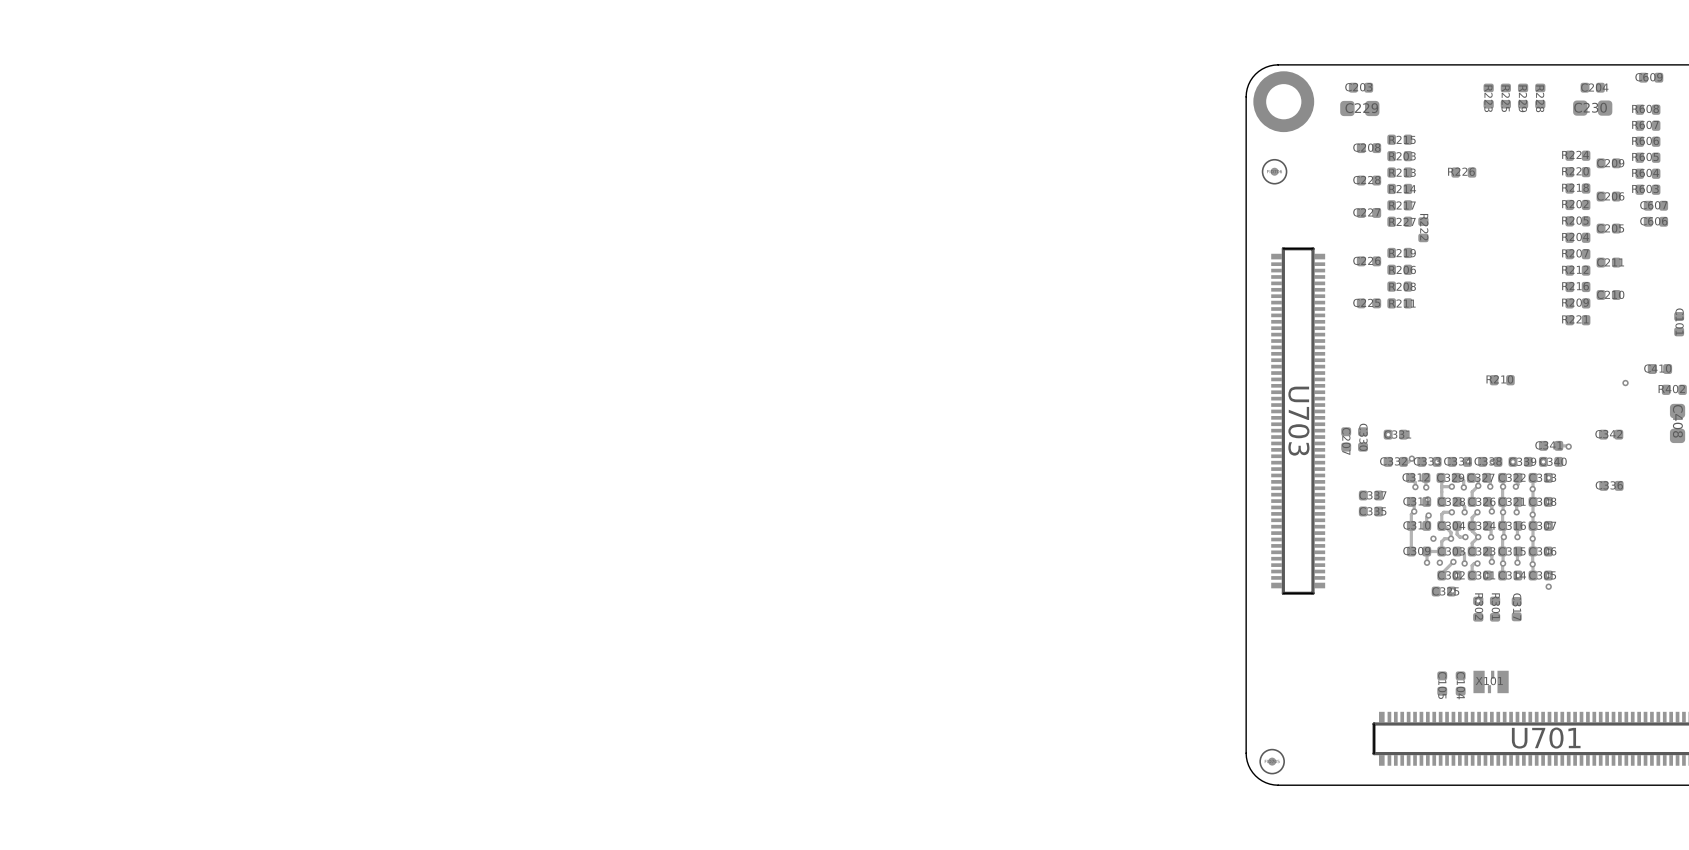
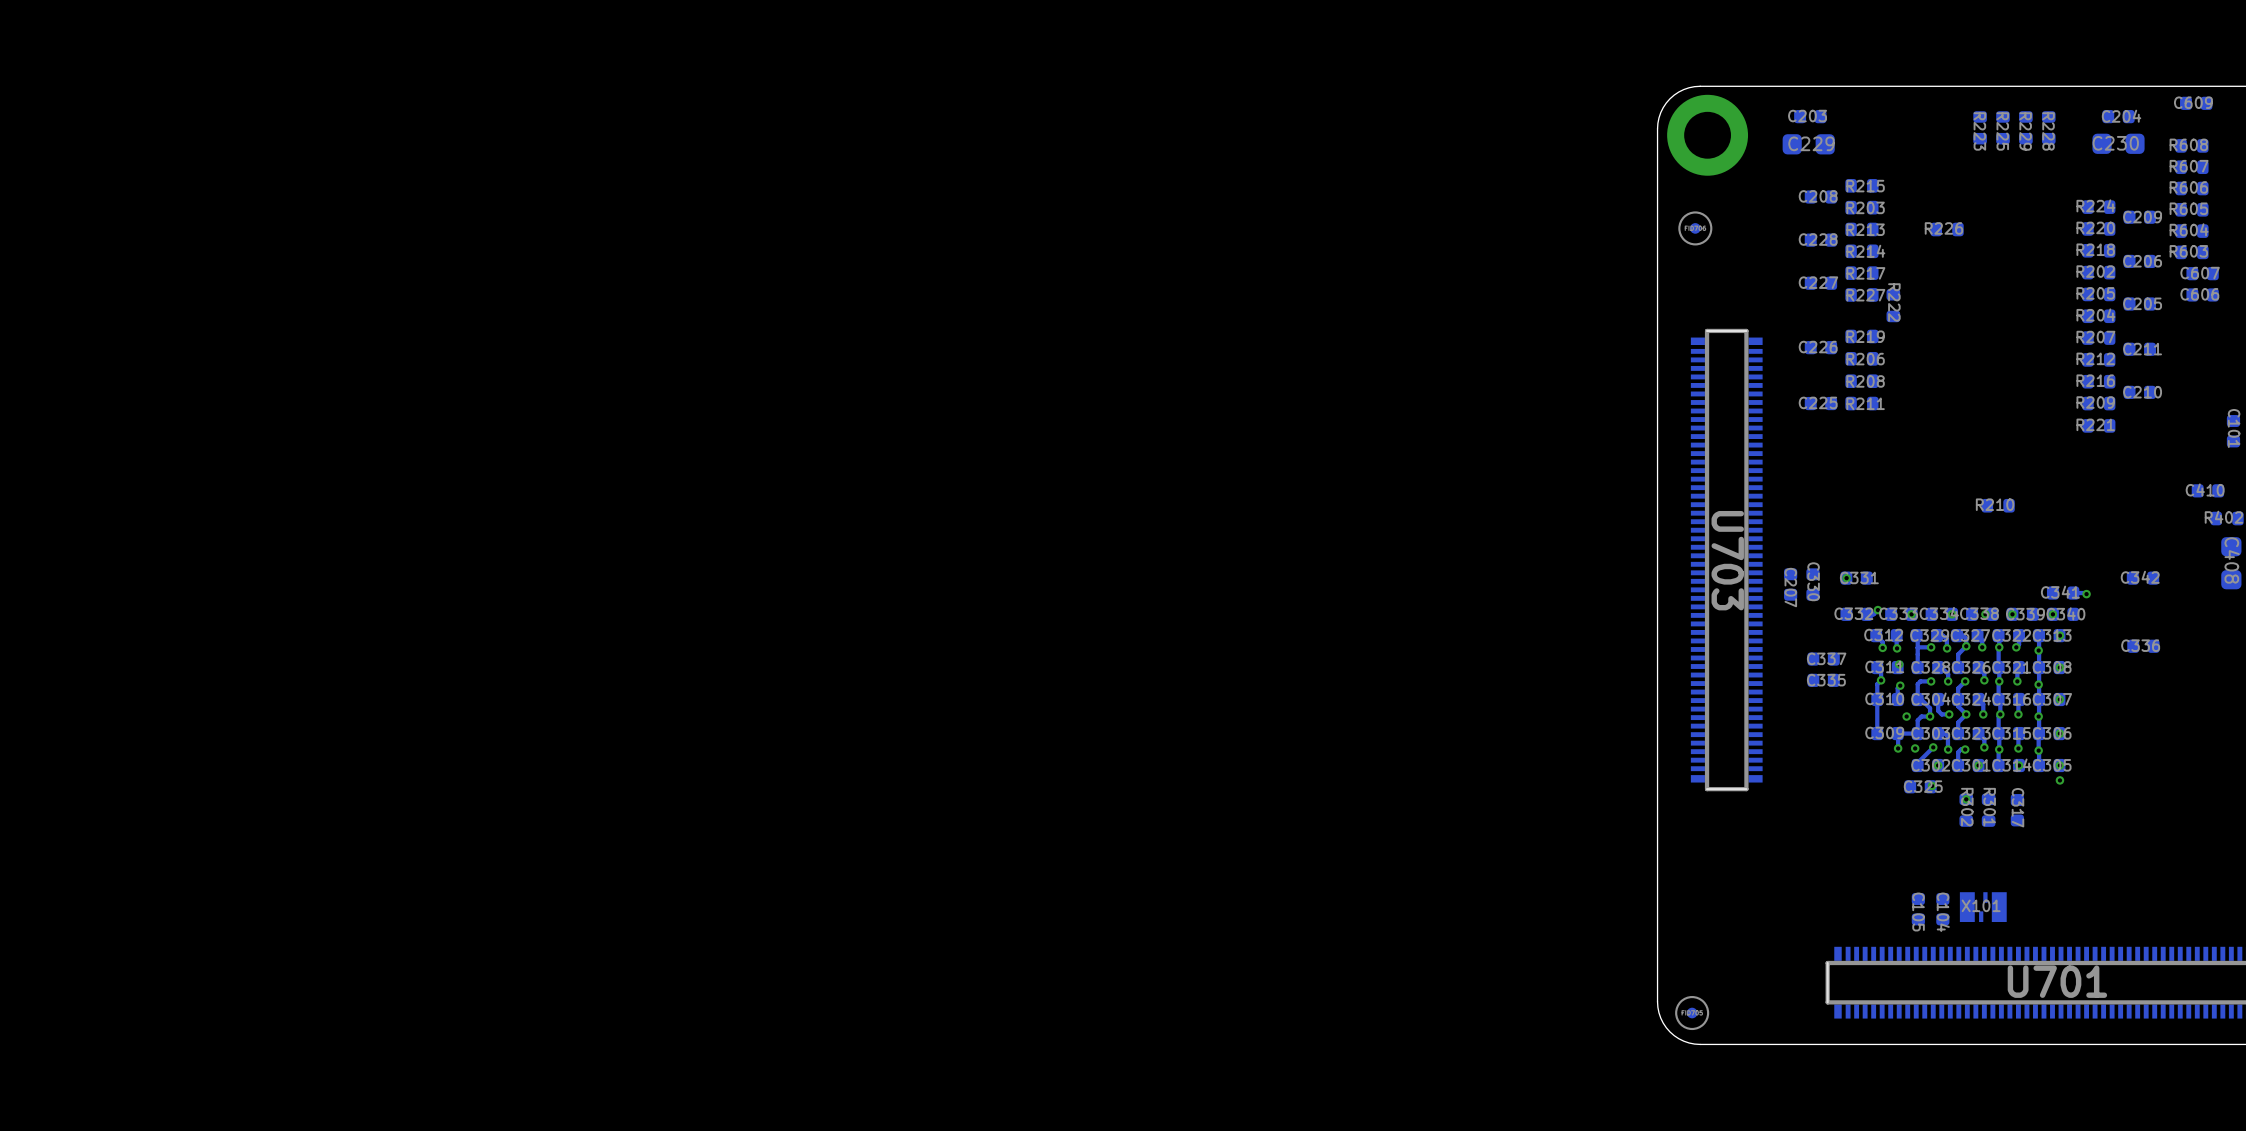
via: (1625, 383) -> none

